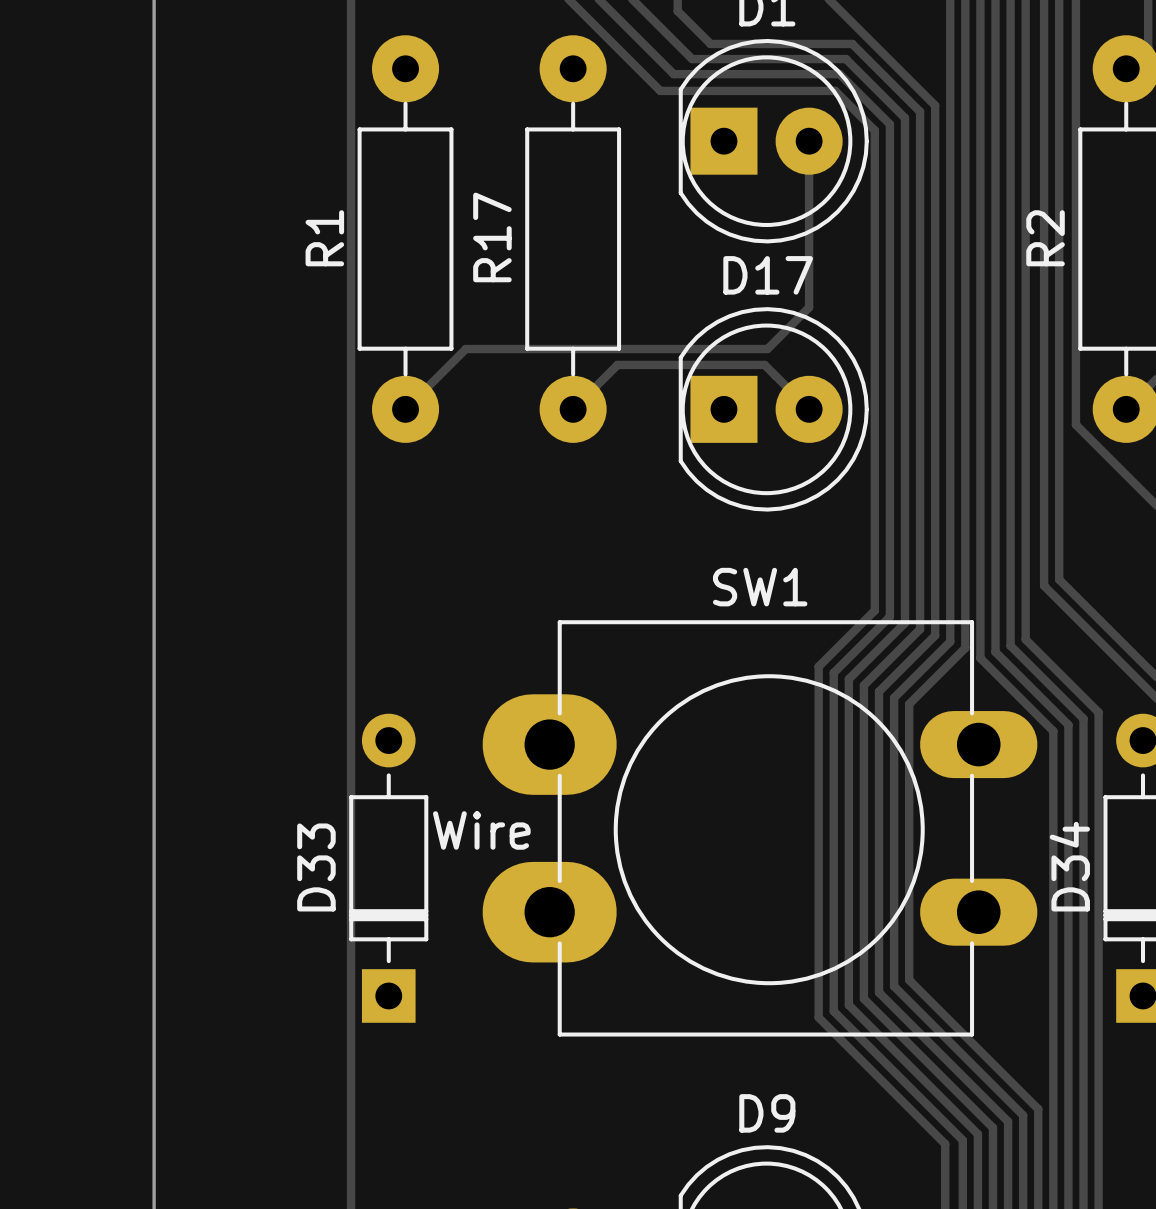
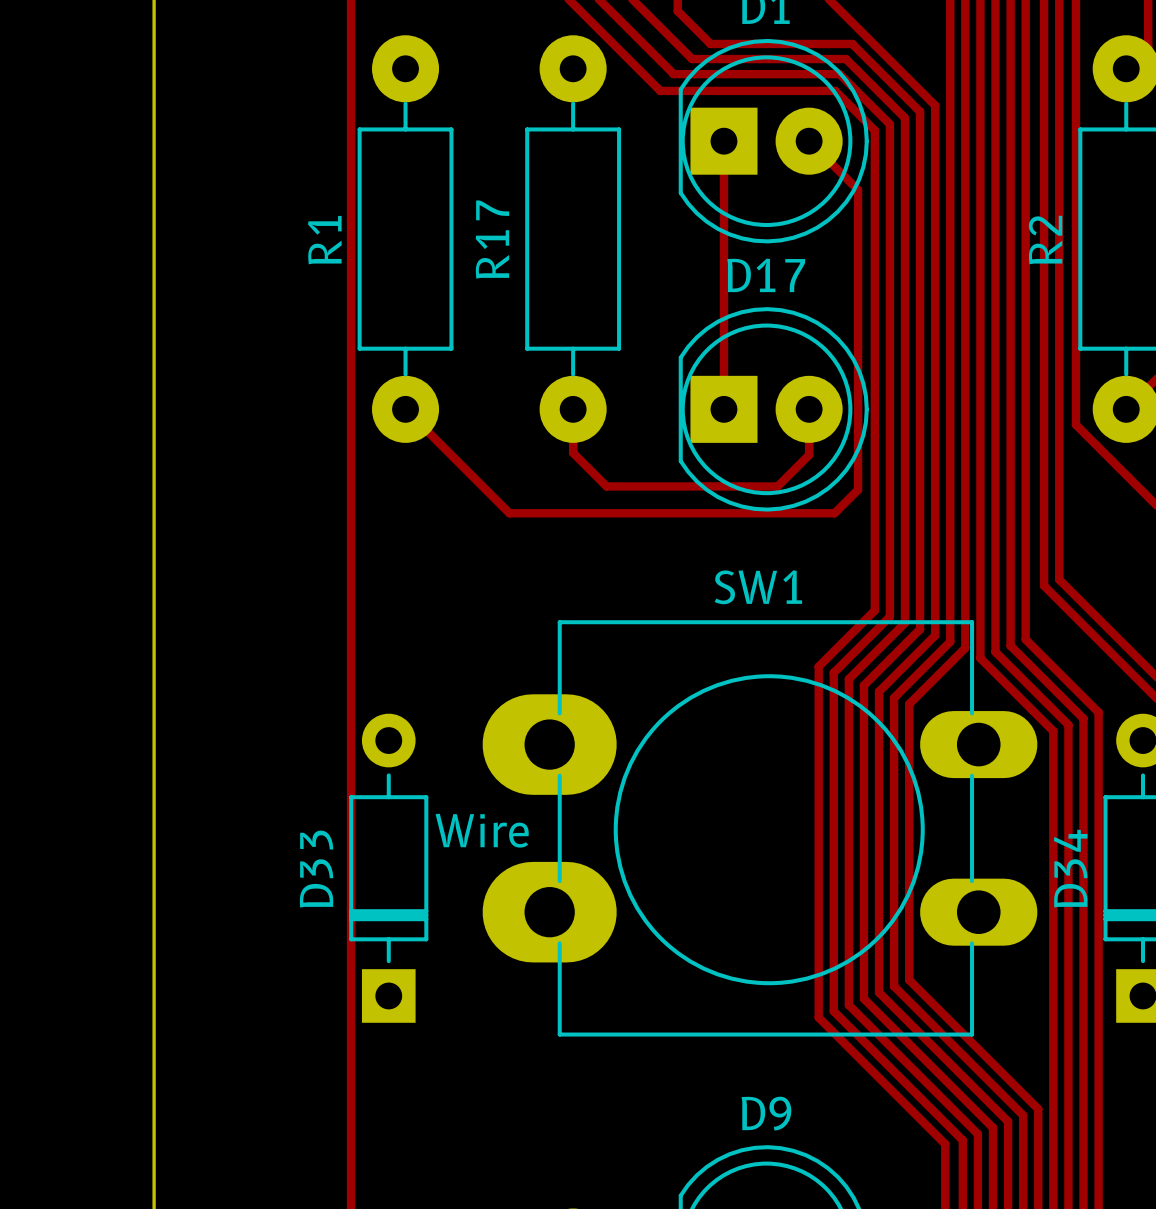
track: none -> (723, 141) (723, 409)
track: (809, 141) (809, 307) (767, 349) (465, 349) (405, 409) -> (809, 141) (858, 190) (858, 489) (834, 513) (509, 513) (405, 409)
track: (573, 409) (617, 364) (764, 364) (809, 409) -> (573, 409) (573, 452) (606, 486) (777, 486) (809, 454) (809, 409)

